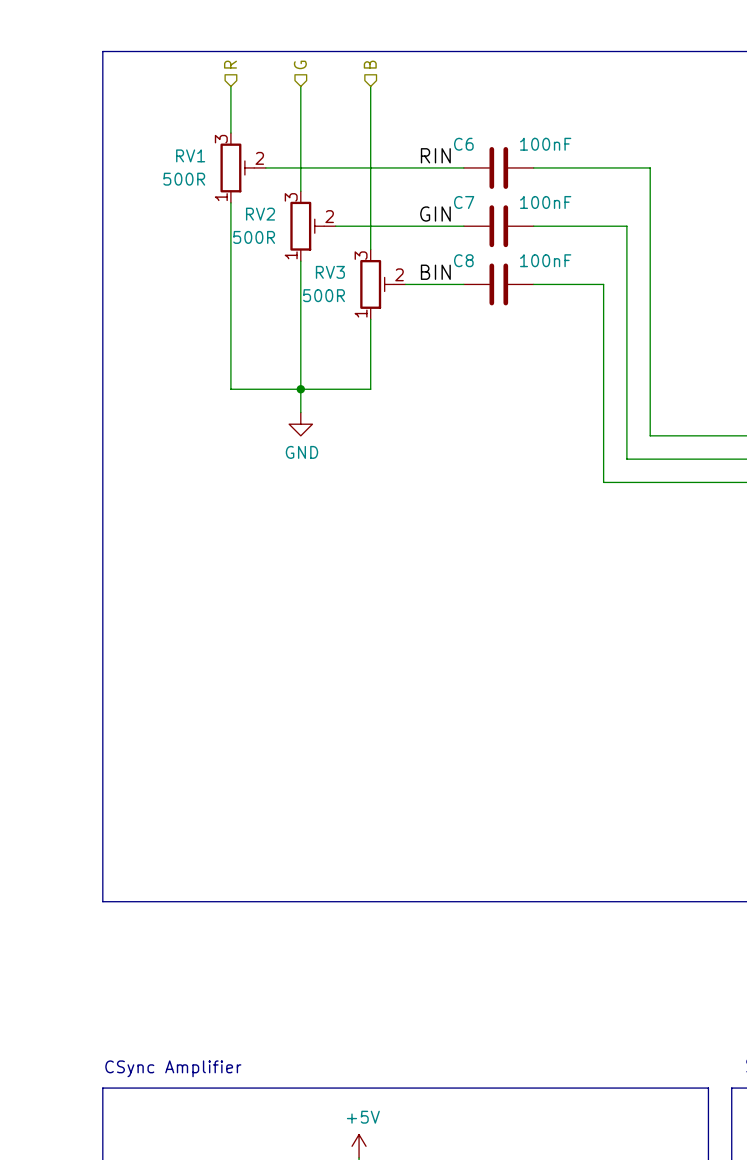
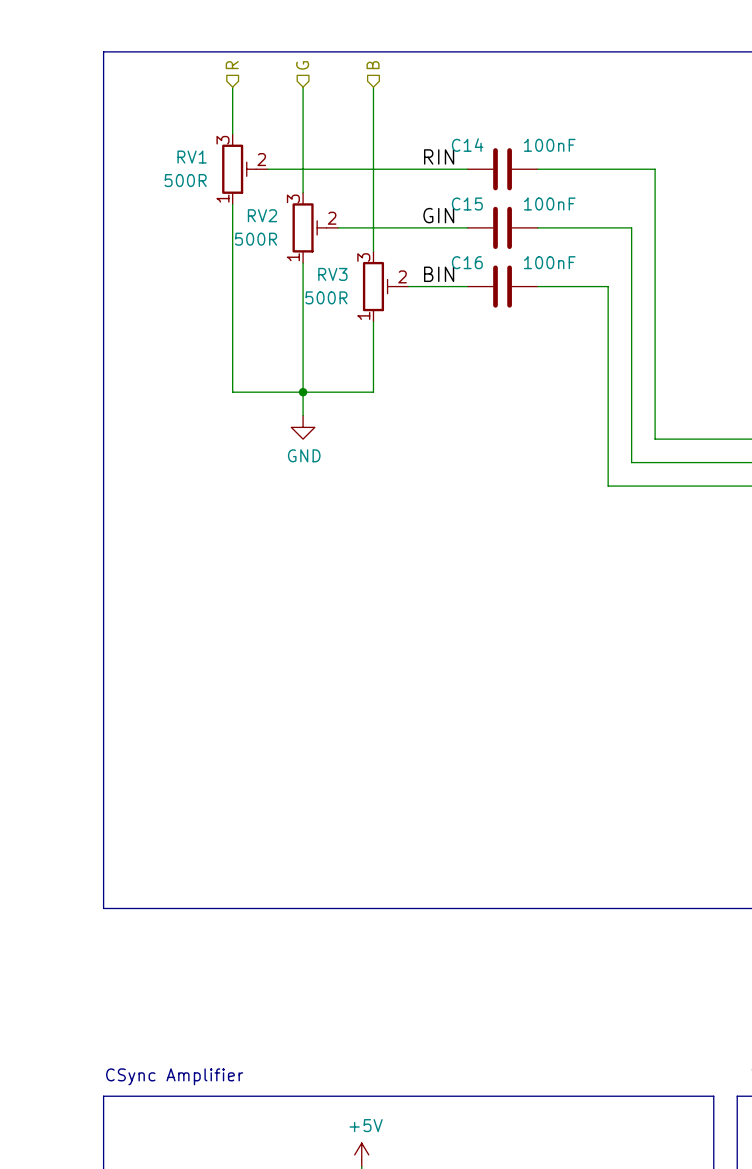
C6 name: C6 (463, 144) -> C14 (467, 145)
C7 name: C7 (464, 202) -> C15 (467, 204)
C8 name: C8 (463, 260) -> C16 (467, 262)

